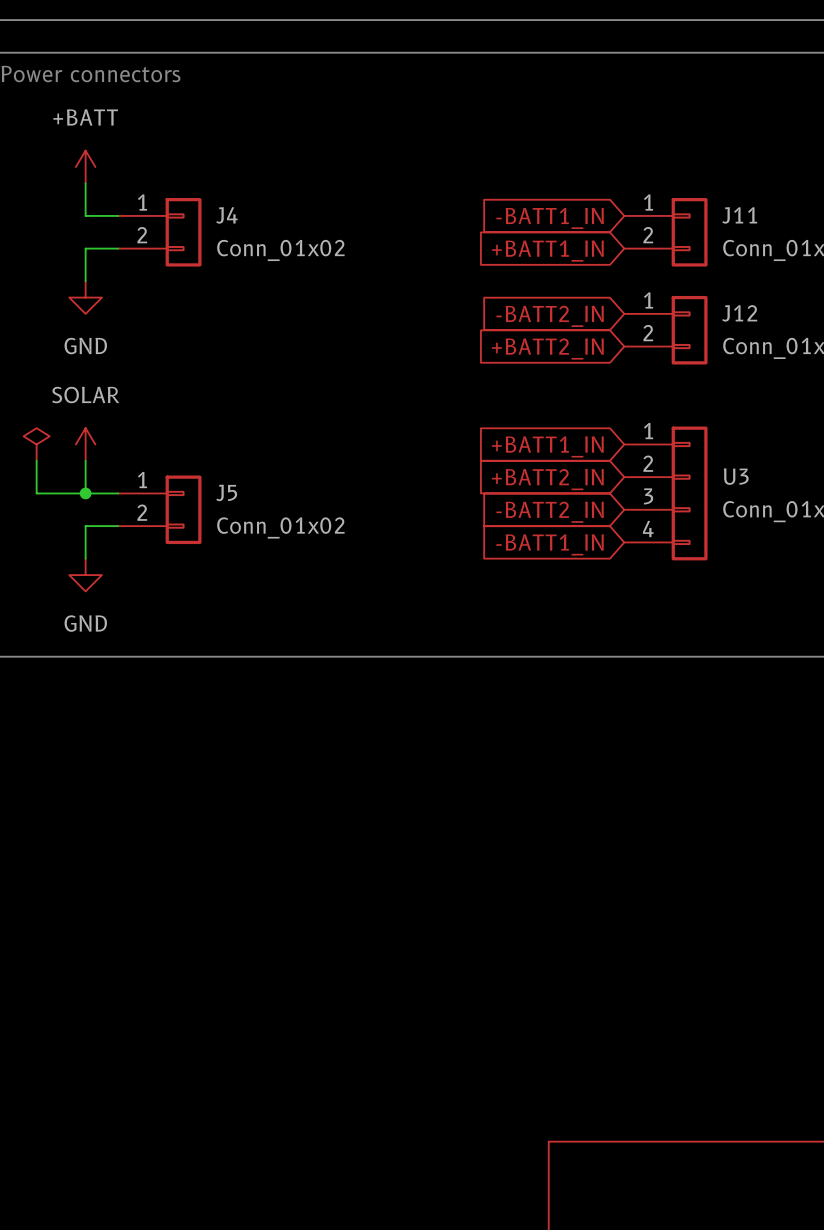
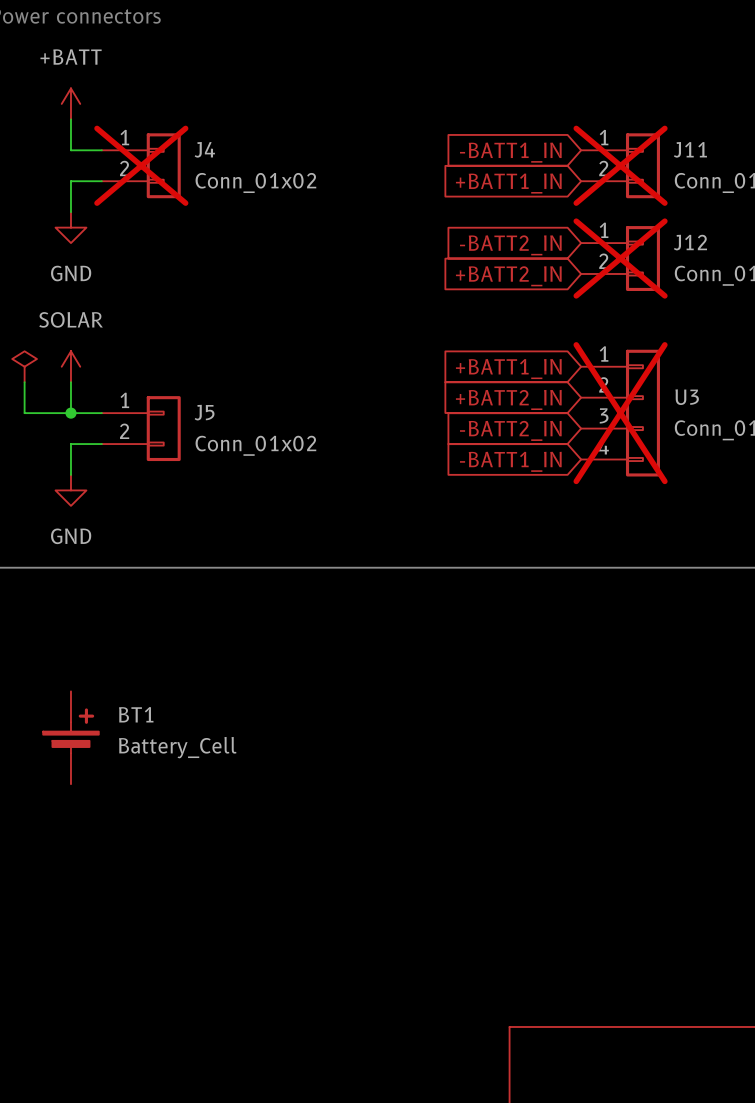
J4 do-not-place cross: none -> (141, 165)
J11 do-not-place cross: none -> (620, 165)
J12 do-not-place cross: none -> (620, 258)
U3 do-not-place cross: none -> (620, 413)
BT1: none -> Battery_Cell (70, 737)

